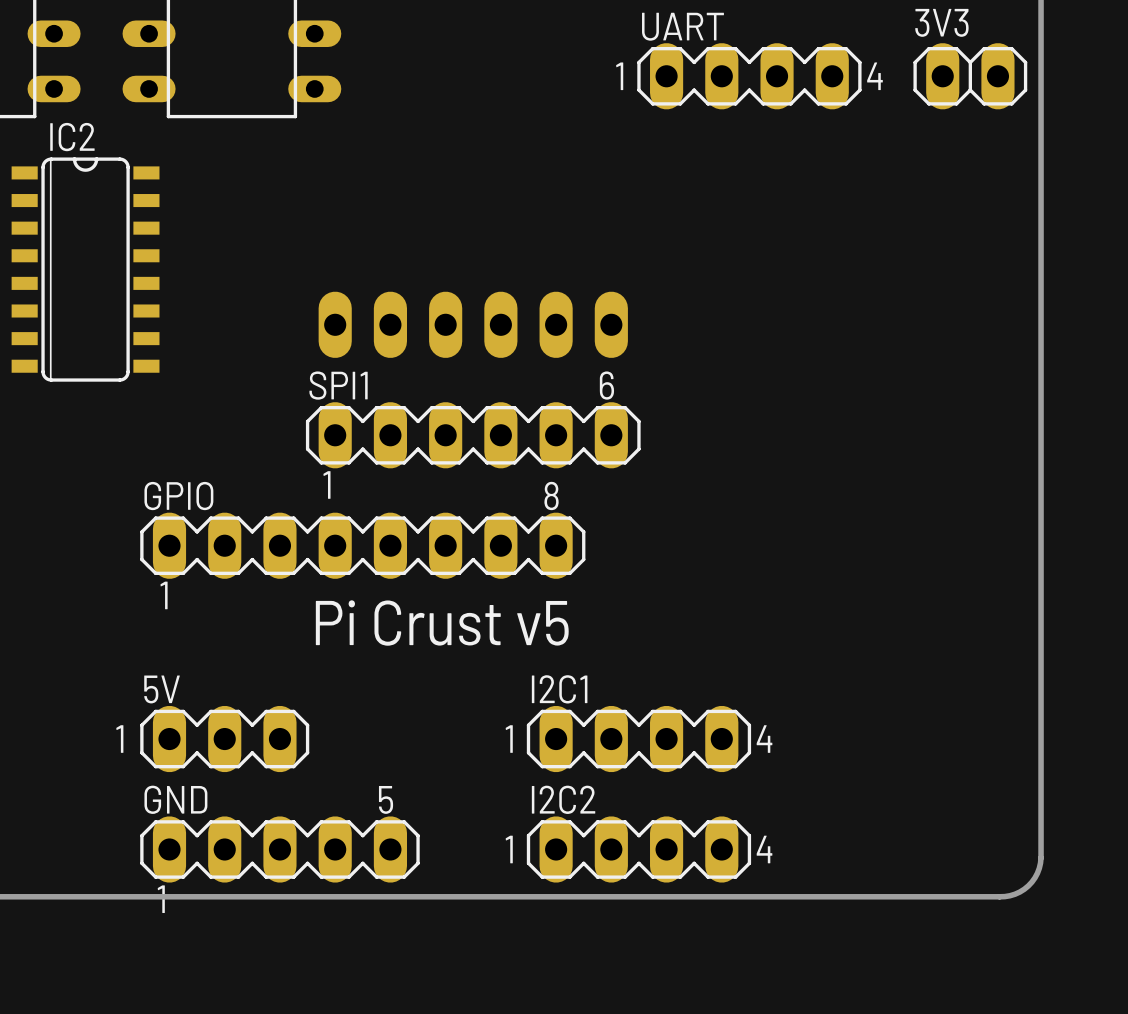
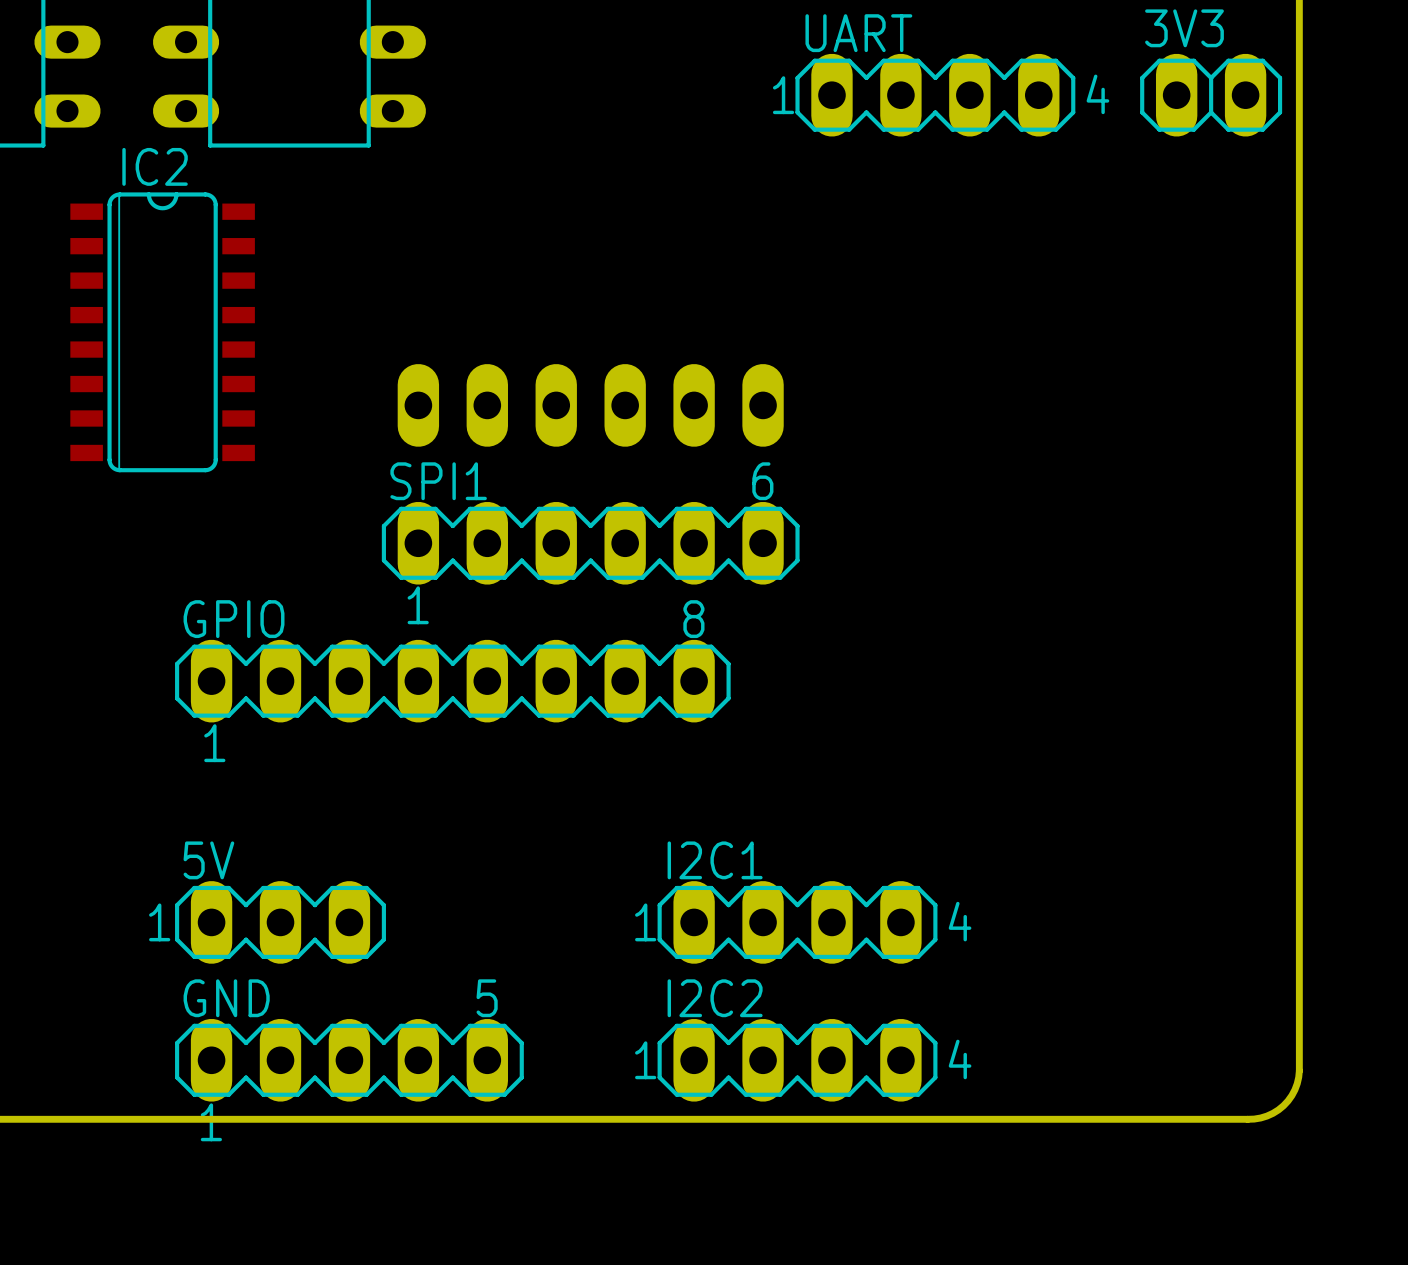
IC2 position: (85, 269) -> (162, 332)
text: Pi Crust v5 (442, 623) -> none

